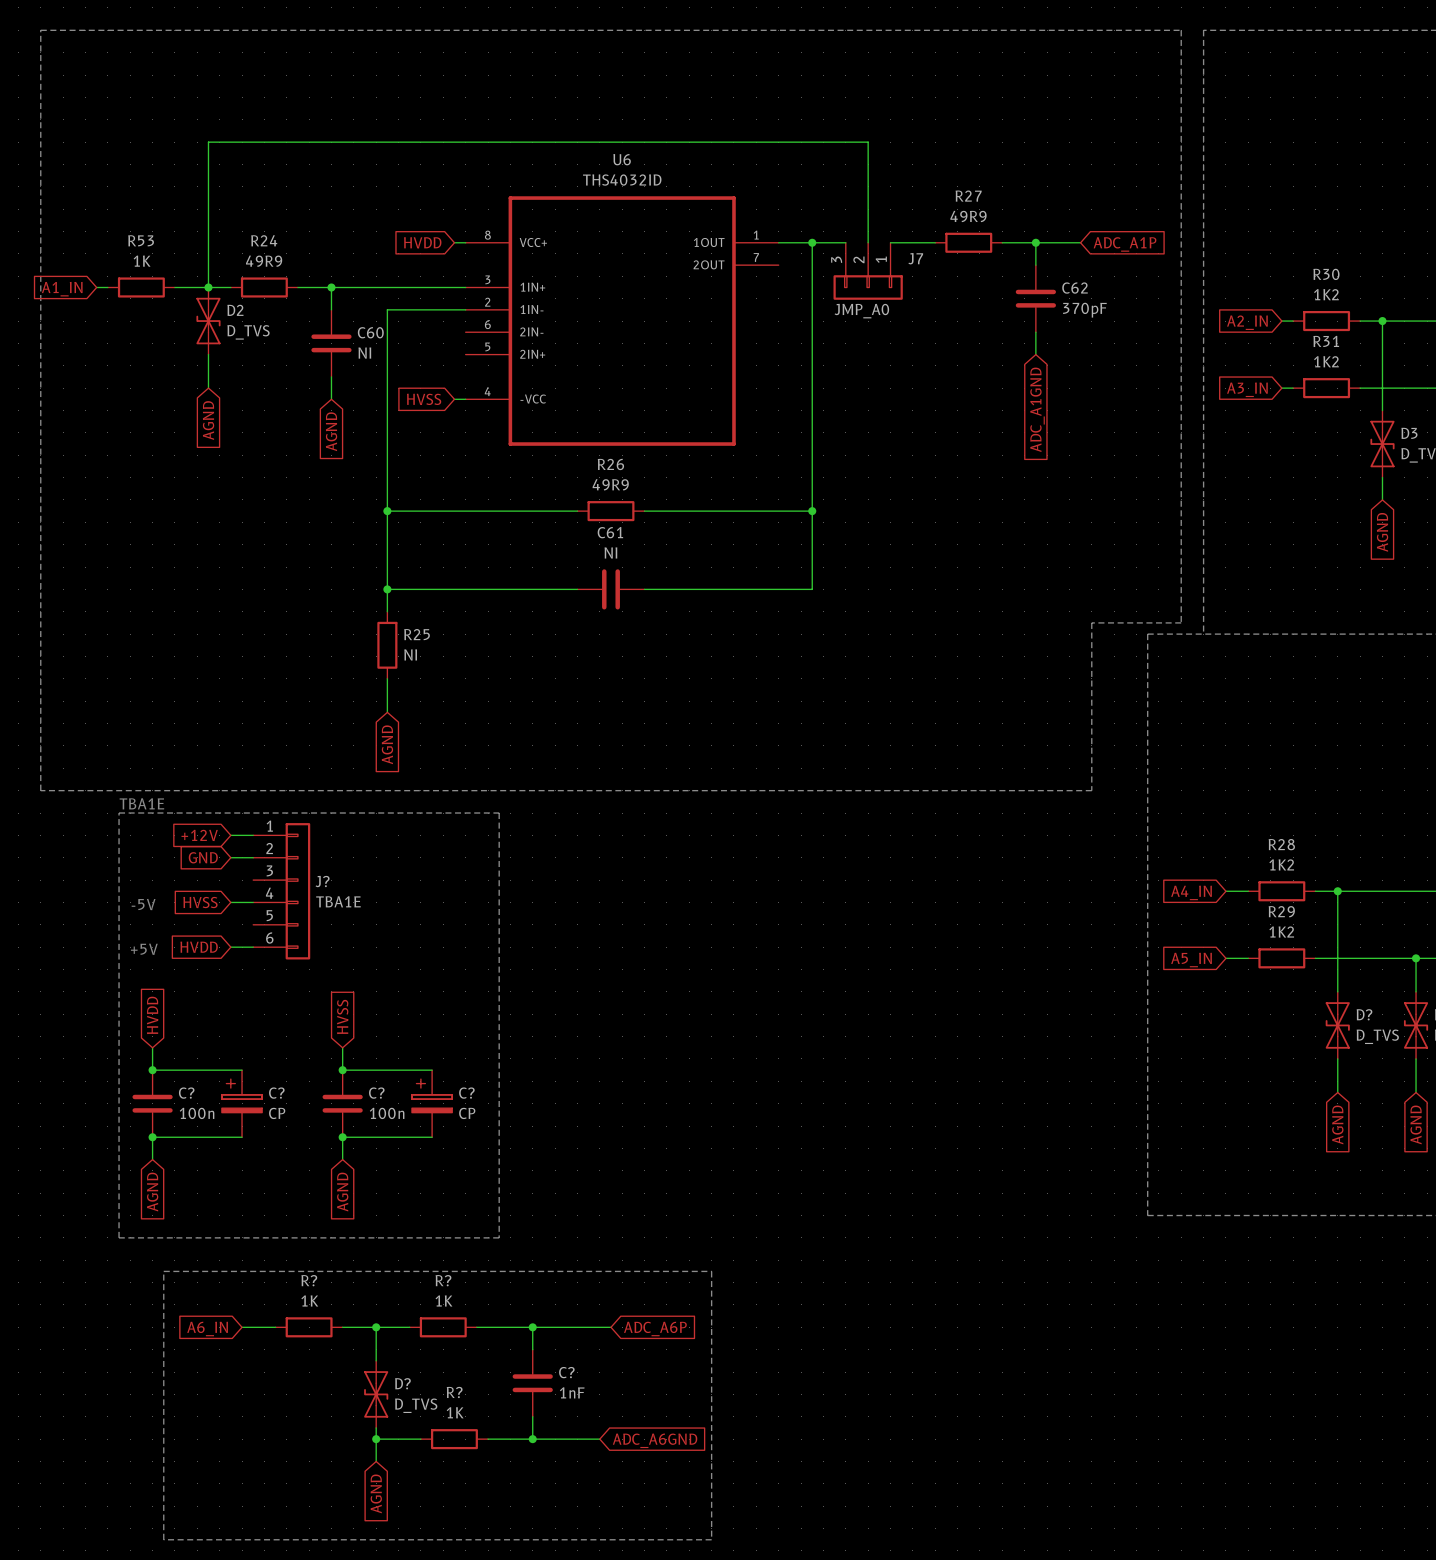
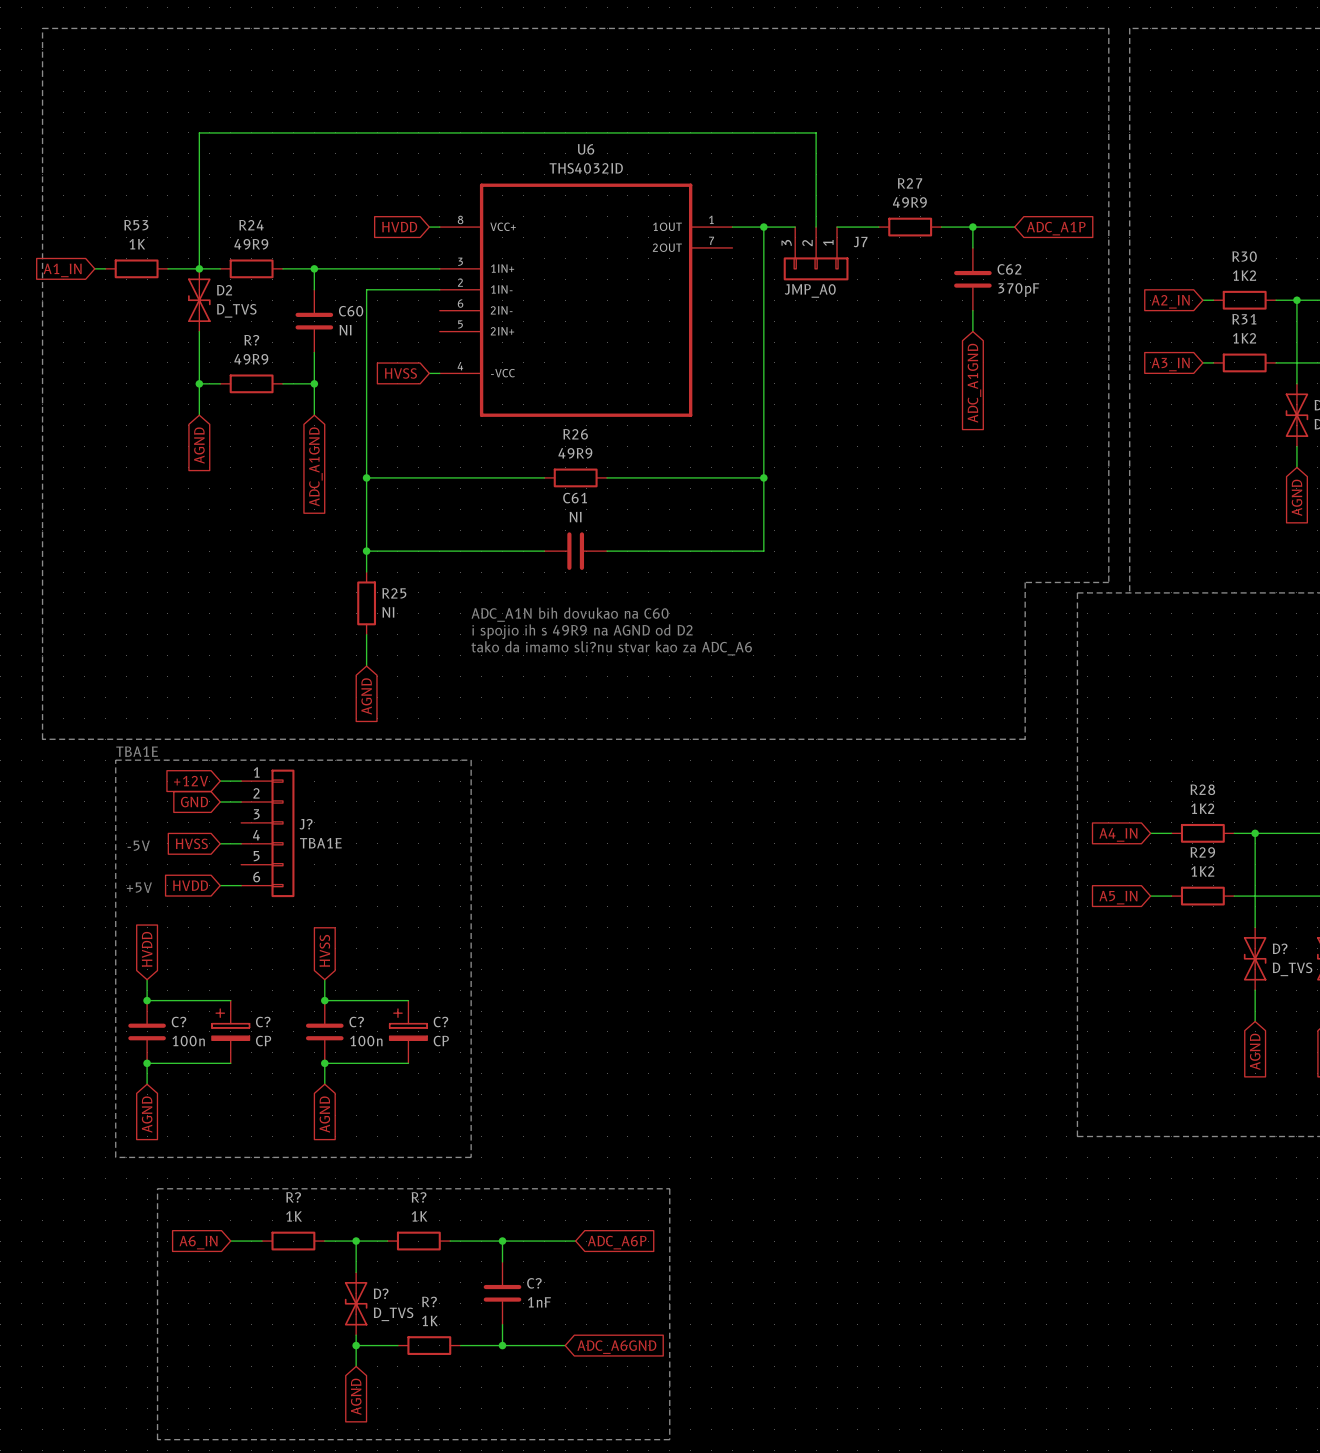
wire: none -> (199, 362) (199, 415)
wire: none -> (314, 373) (314, 415)
wire: none -> (199, 383) (220, 383)
junction: none -> (199, 383)
R?: none -> 49R9 (251, 383)
wire: none -> (282, 383) (314, 383)
junction: none -> (314, 383)
global label position: AGND (208, 420) -> AGND (199, 445)
global label: AGND (331, 431) -> ADC_A1GND (315, 466)
text: none -> ADC_A1N bih dovukao na C60 (570, 614)
text: none -> i spojio ih s 49R9 na AGND od D2 (582, 631)
text: none -> tako da imamo sli?nu stvar kao za ADC_A6 (611, 648)

